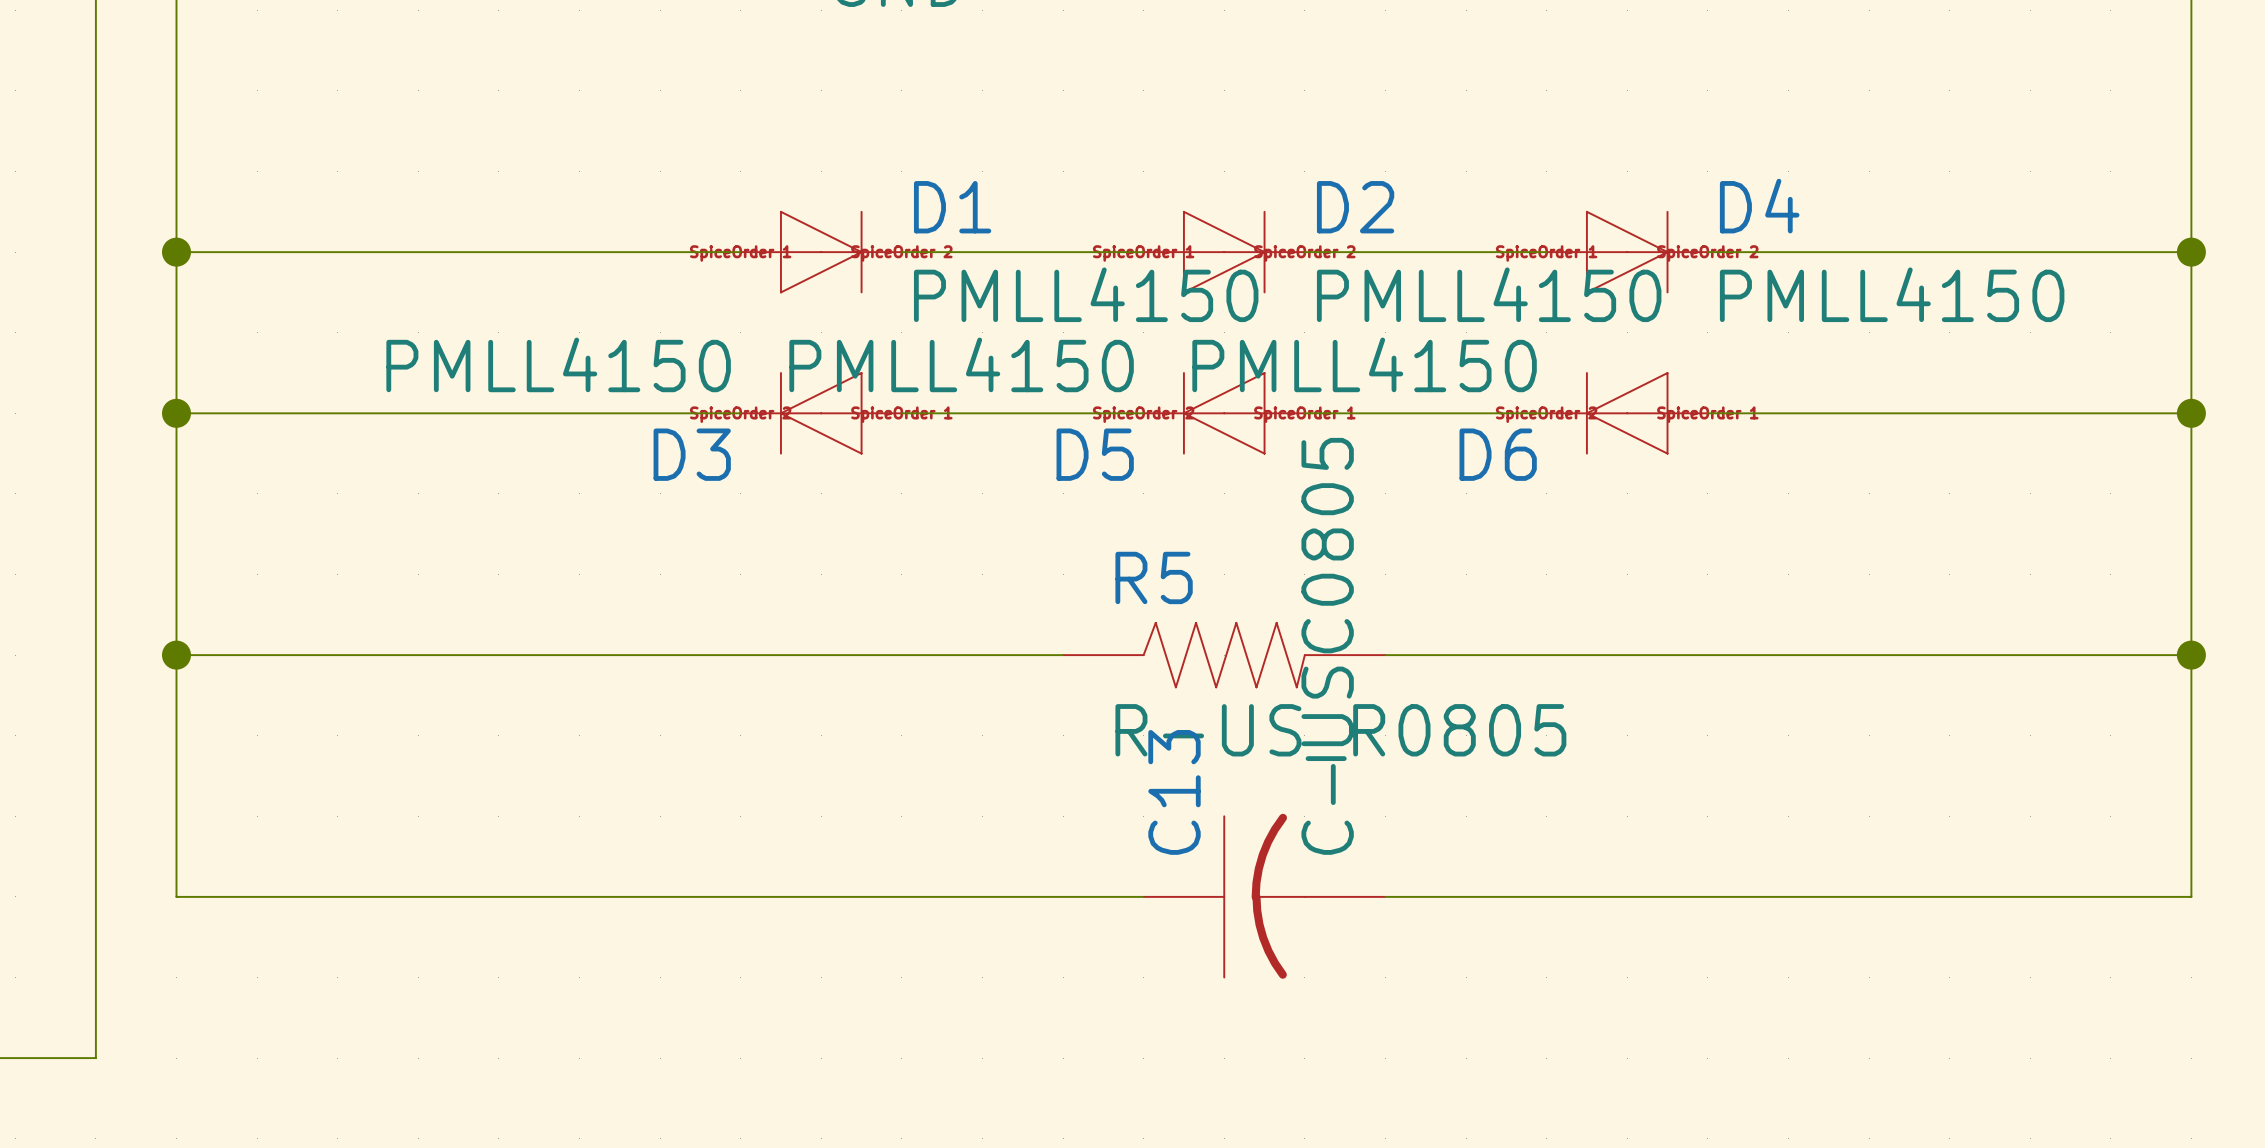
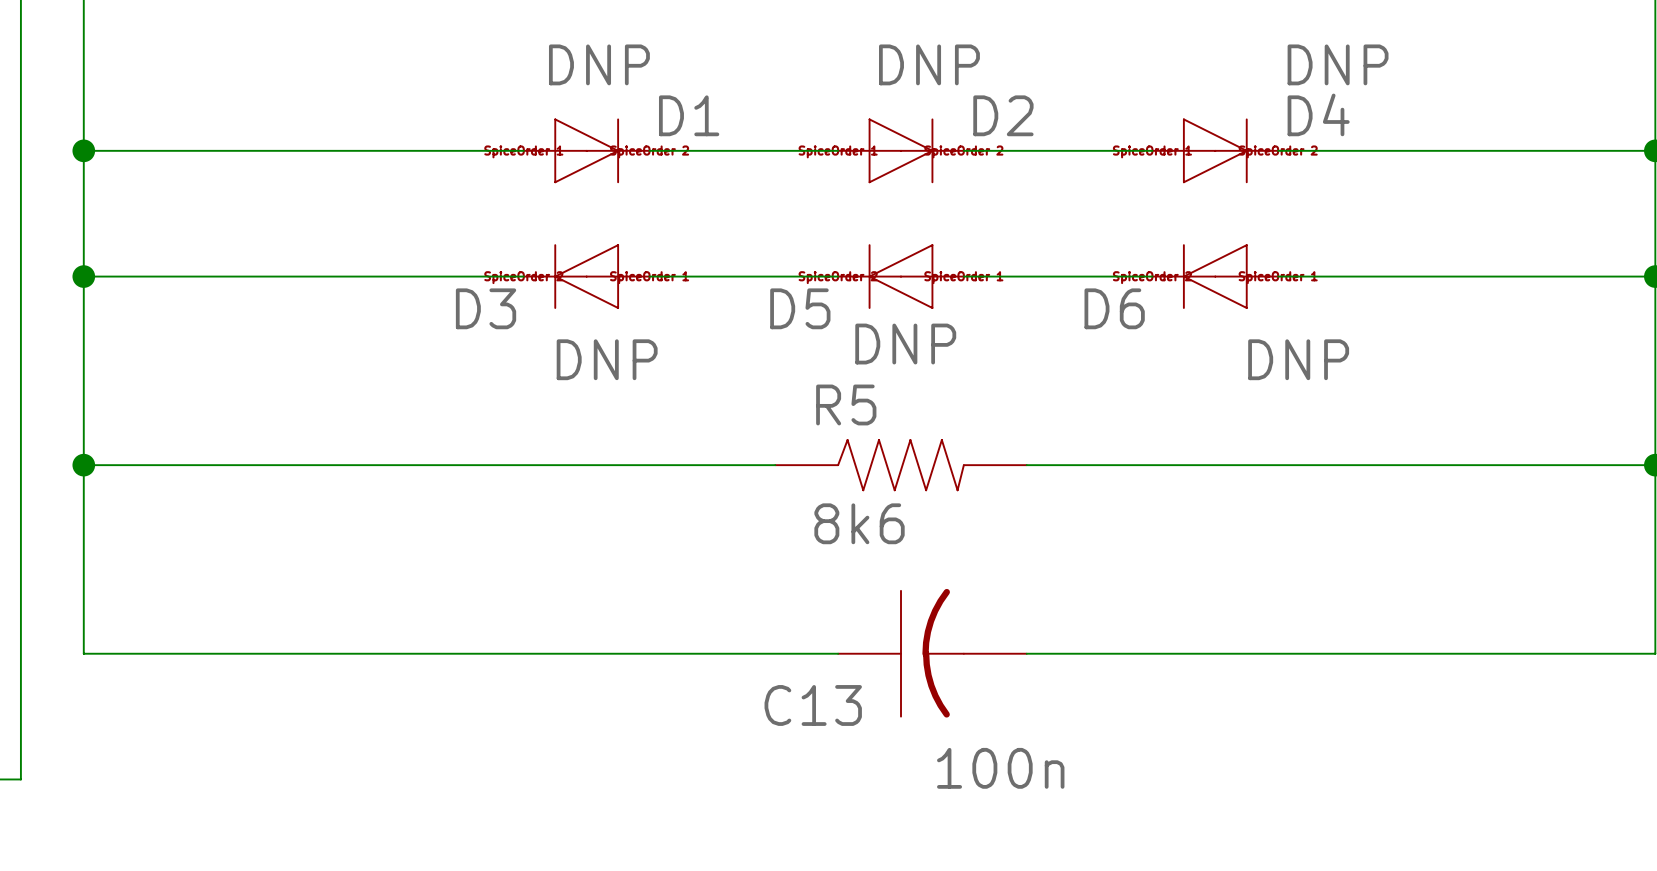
D1 value: PMLL4150 (1086, 294) -> DNP (599, 64)
D2 value: PMLL4150 (1489, 294) -> DNP (929, 64)
D4 value: PMLL4150 (1892, 294) -> DNP (1338, 64)
D3 value: PMLL4150 (558, 364) -> DNP (607, 359)
D5 value: PMLL4150 (961, 364) -> DNP (905, 344)
D6 value: PMLL4150 (1364, 364) -> DNP (1298, 359)
C13 value: C-USC0805 (1327, 646) -> 100n (1000, 768)
R5 value: R-US_R0805 (1340, 732) -> 8k6 (859, 523)
C13 name rotation: 0° (1174, 792) -> 90° clockwise (813, 705)
C13 name position: C13 (1174, 792) -> C13 (813, 705)

